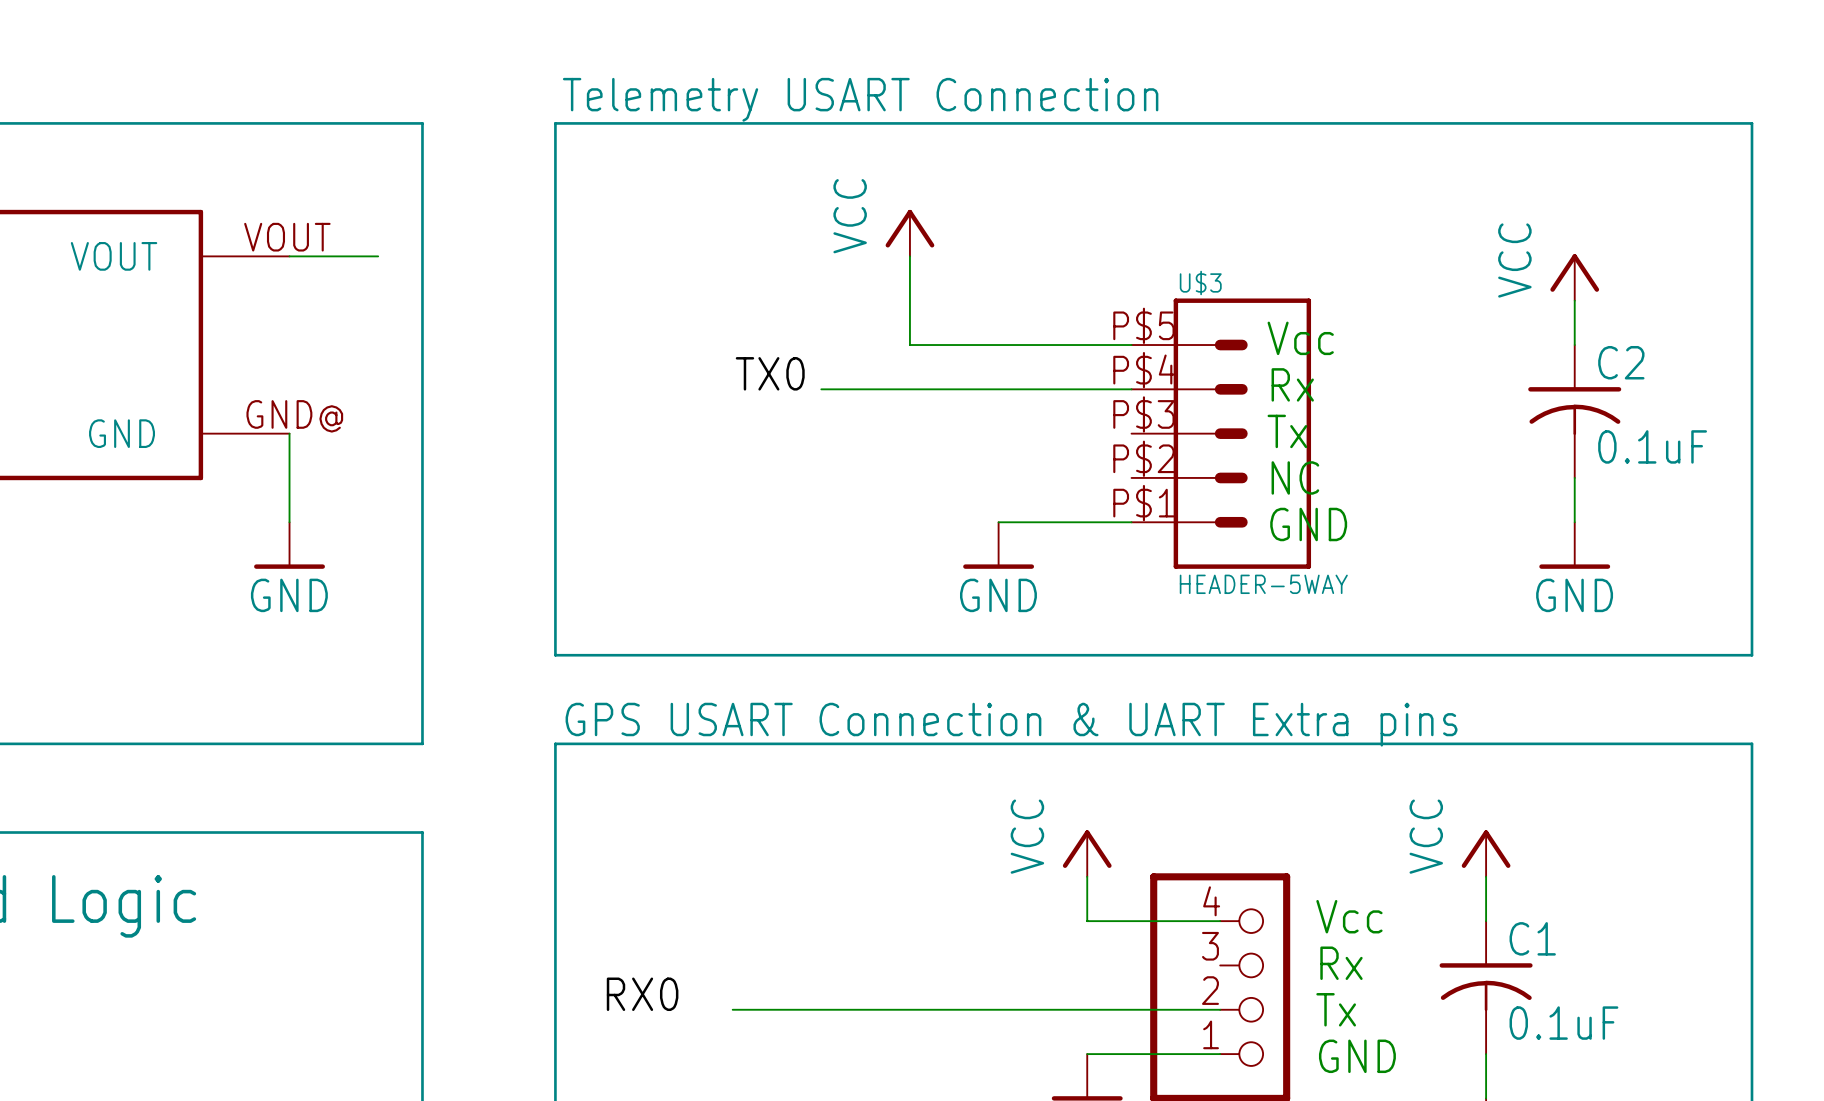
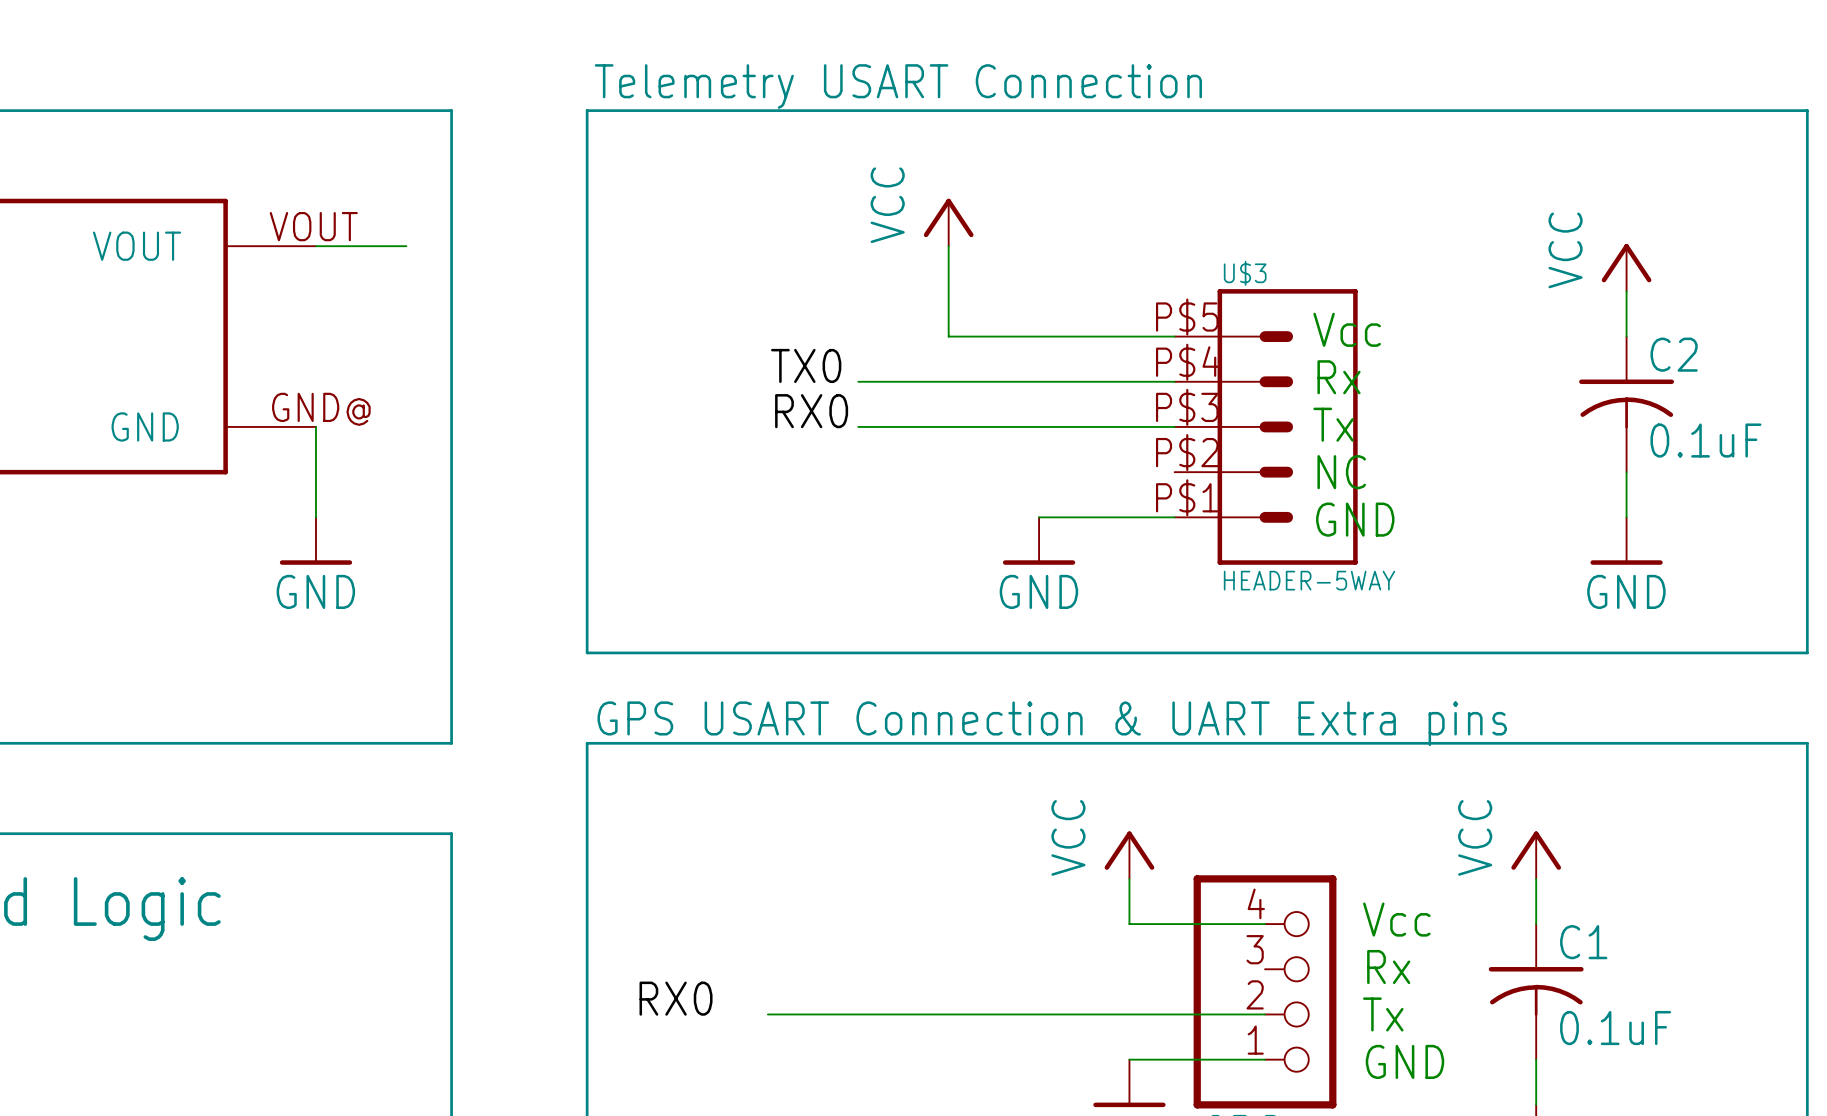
label: none -> RX0 (811, 411)
wire: none -> (858, 426) (1174, 426)

